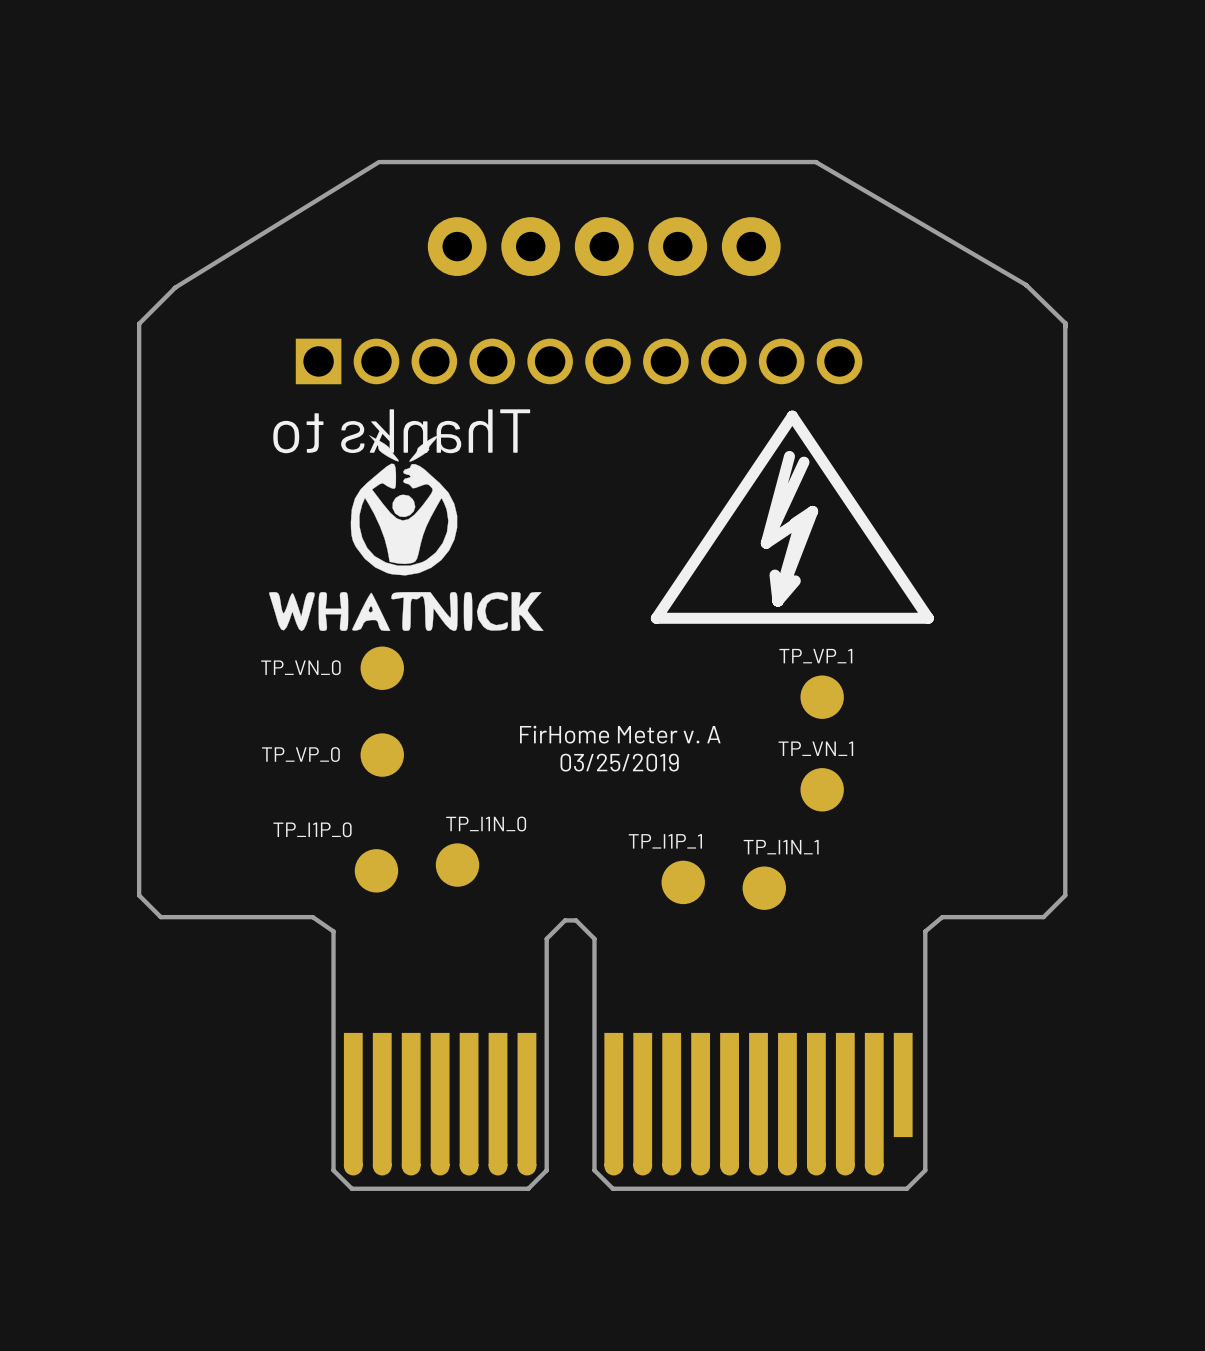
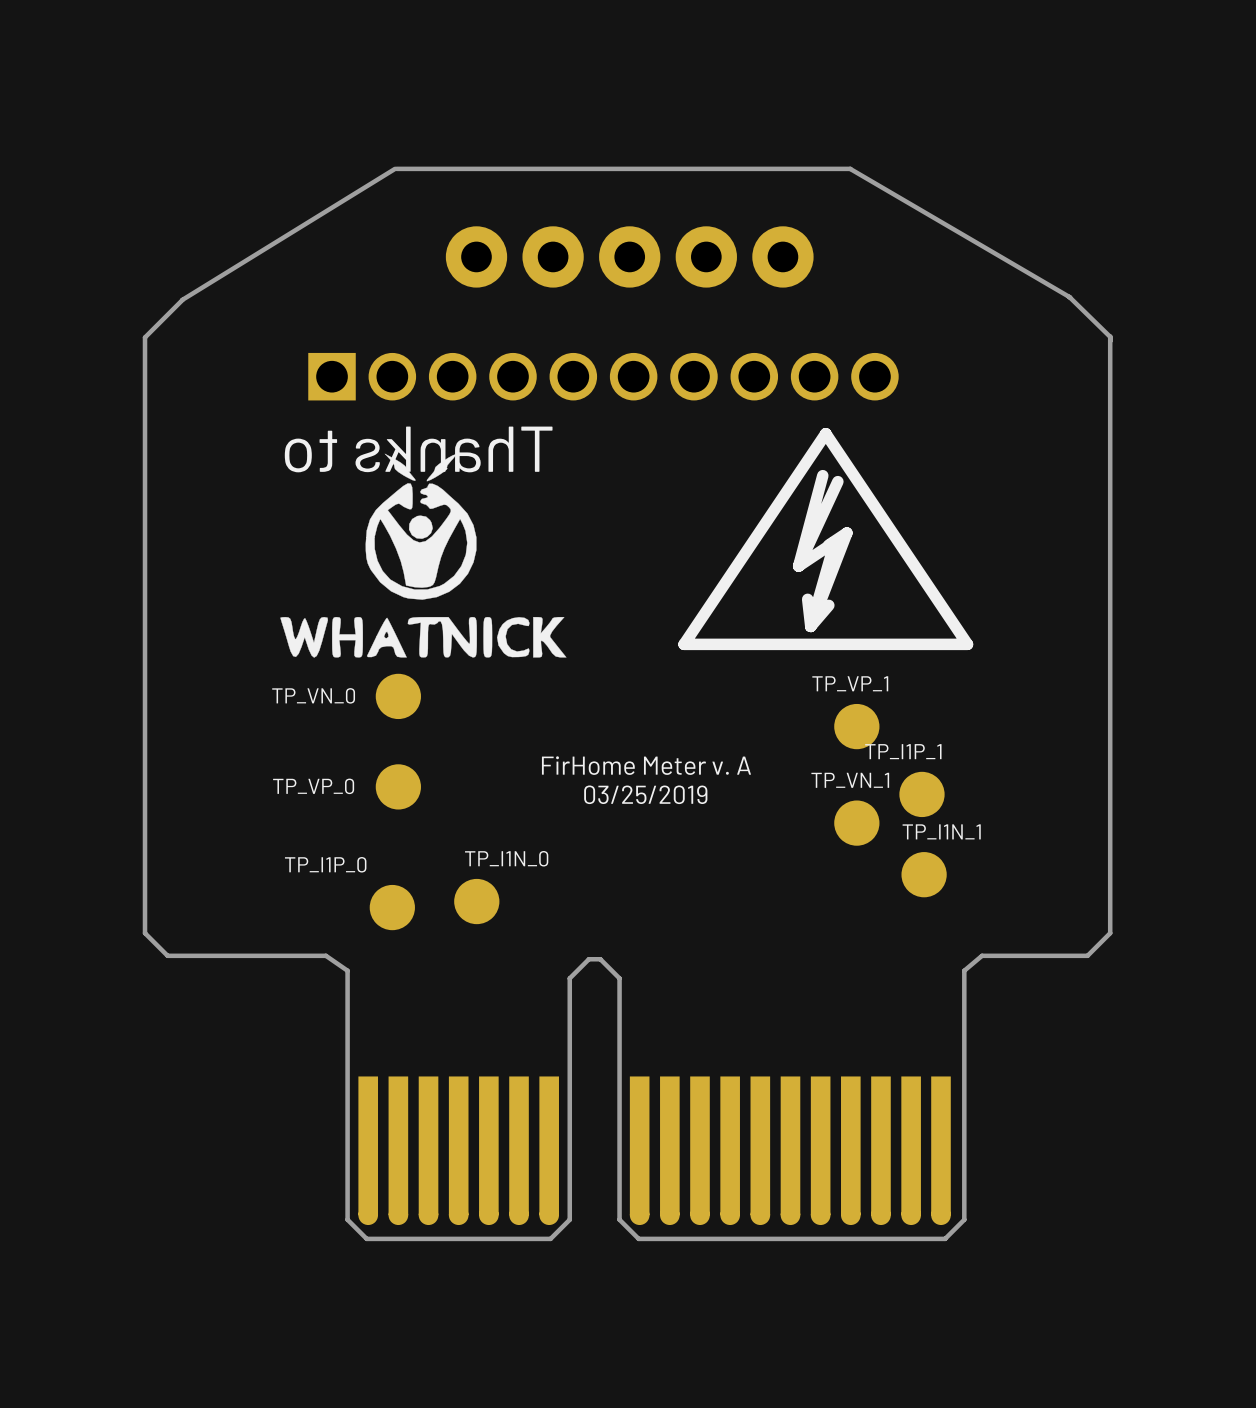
TP_I1P_1 position: (683, 882) -> (921, 794)
TP_I1N_1 position: (764, 888) -> (924, 874)
part footprint: [343, 1032, 913, 1176] -> [358, 1076, 951, 1226]

